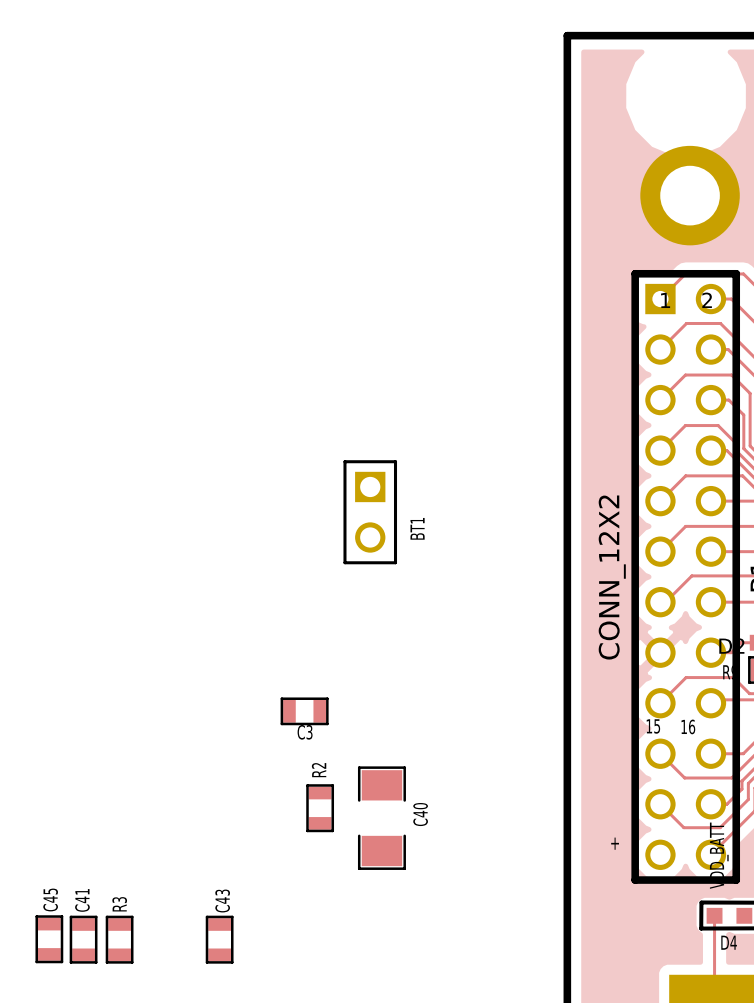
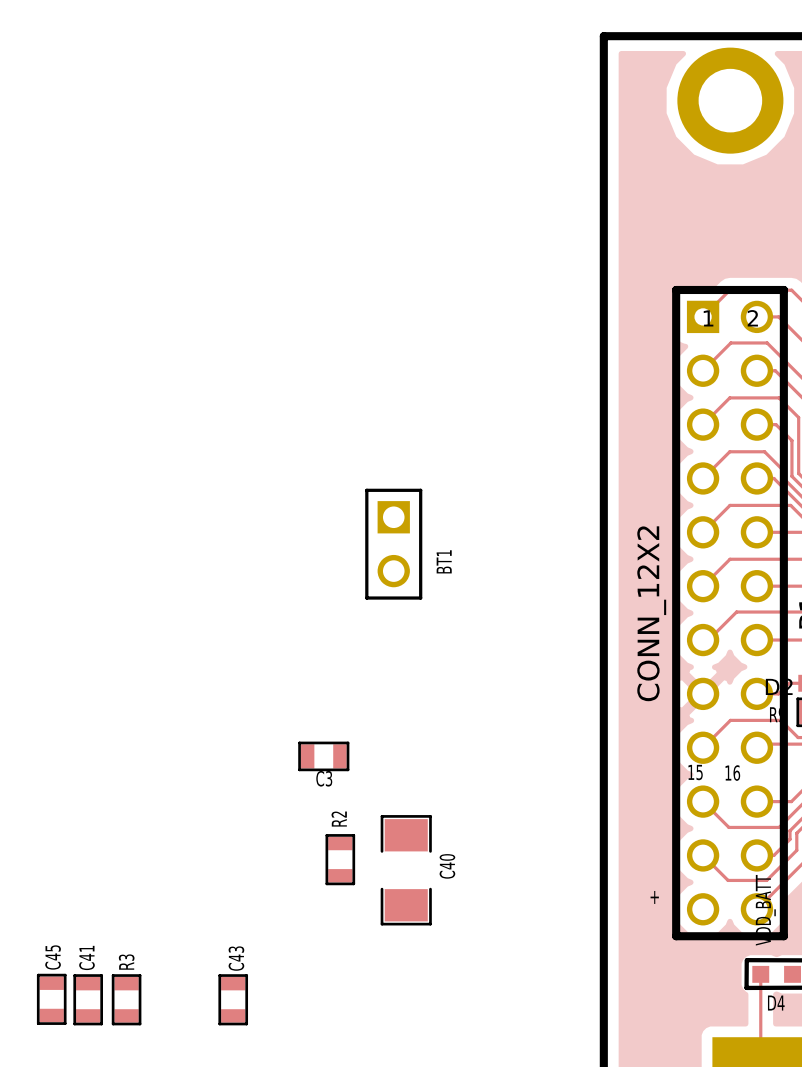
part position: (690, 195) -> (730, 100)

